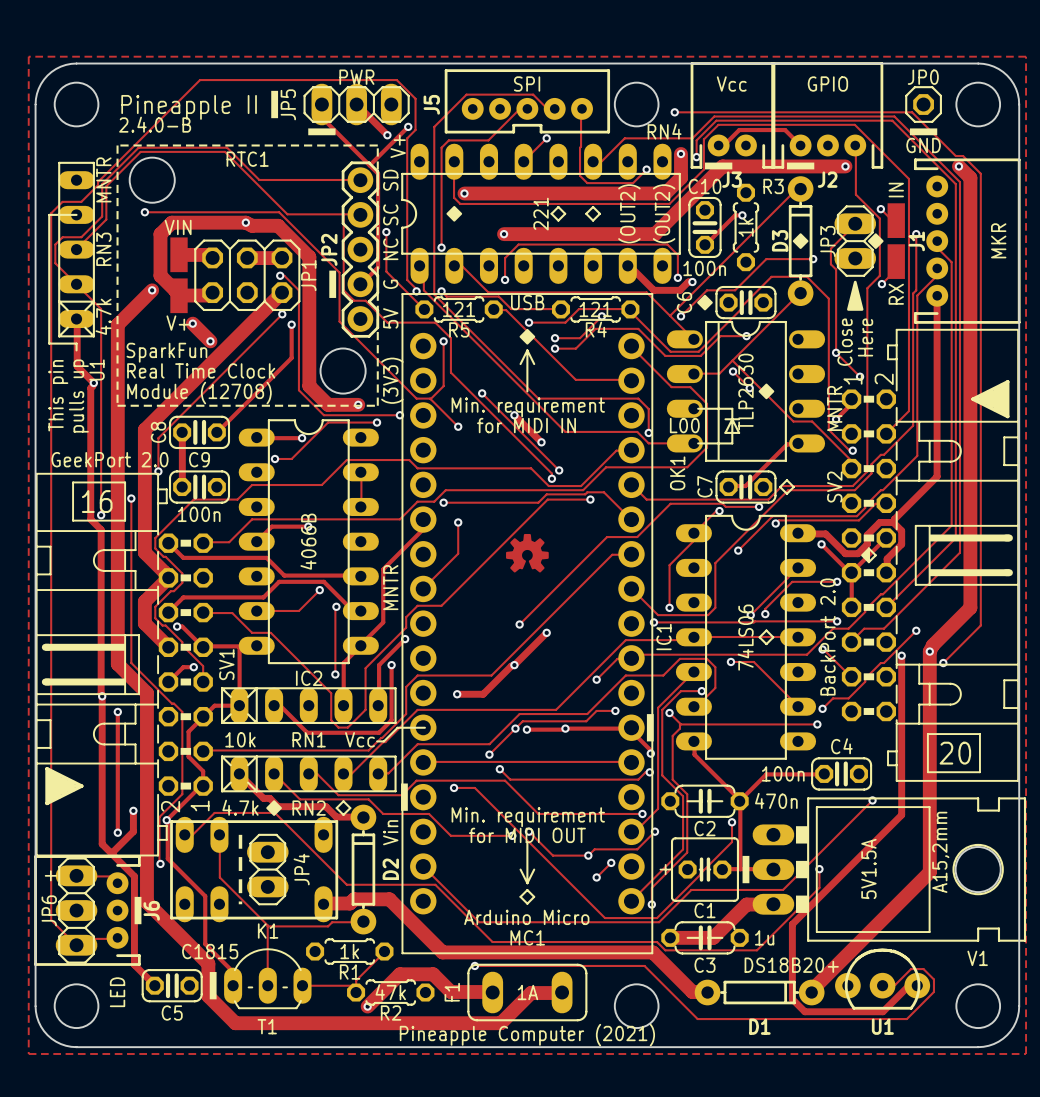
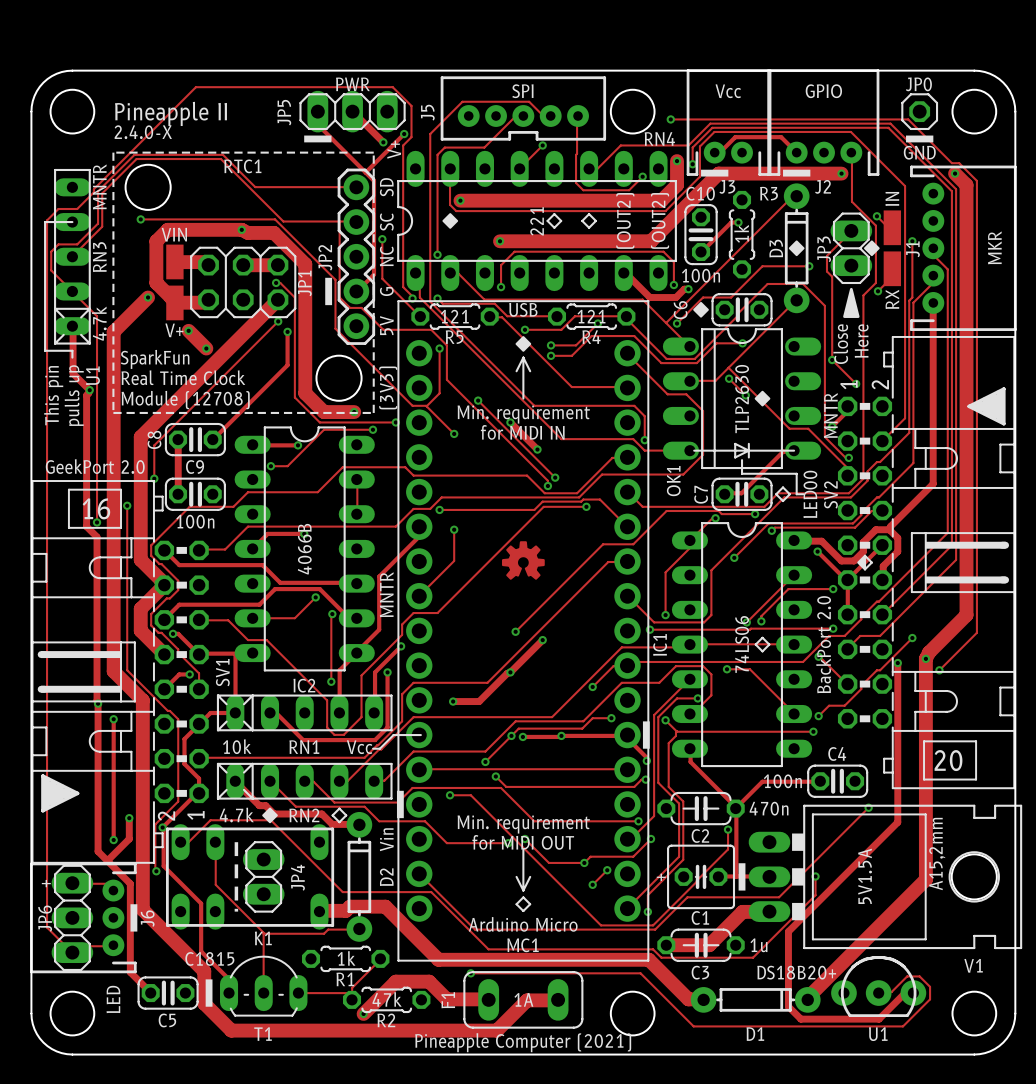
zone outline: (28, 56) (1026, 56) (1026, 1053) (28, 1053) (28, 56) -> none
drawing: [271, 90, 279, 119] -> none
text: 2.4.0-B (155, 124) -> 2.4.0-X (143, 132)
line: (698, 408) (732, 408) (732, 443) -> (794, 450) (728, 450)
line: (725, 419) (739, 419) -> none
line: (732, 419) (725, 432) (739, 432) (732, 419) -> none
text: L00 (684, 425) -> none
line: none -> (735, 443) (735, 457) (748, 450) (735, 443)
line: none -> (748, 443) (748, 457)
line: none -> (742, 460) (742, 473) (796, 473) (796, 494) (803, 494)
text: none -> LED00 (810, 494)

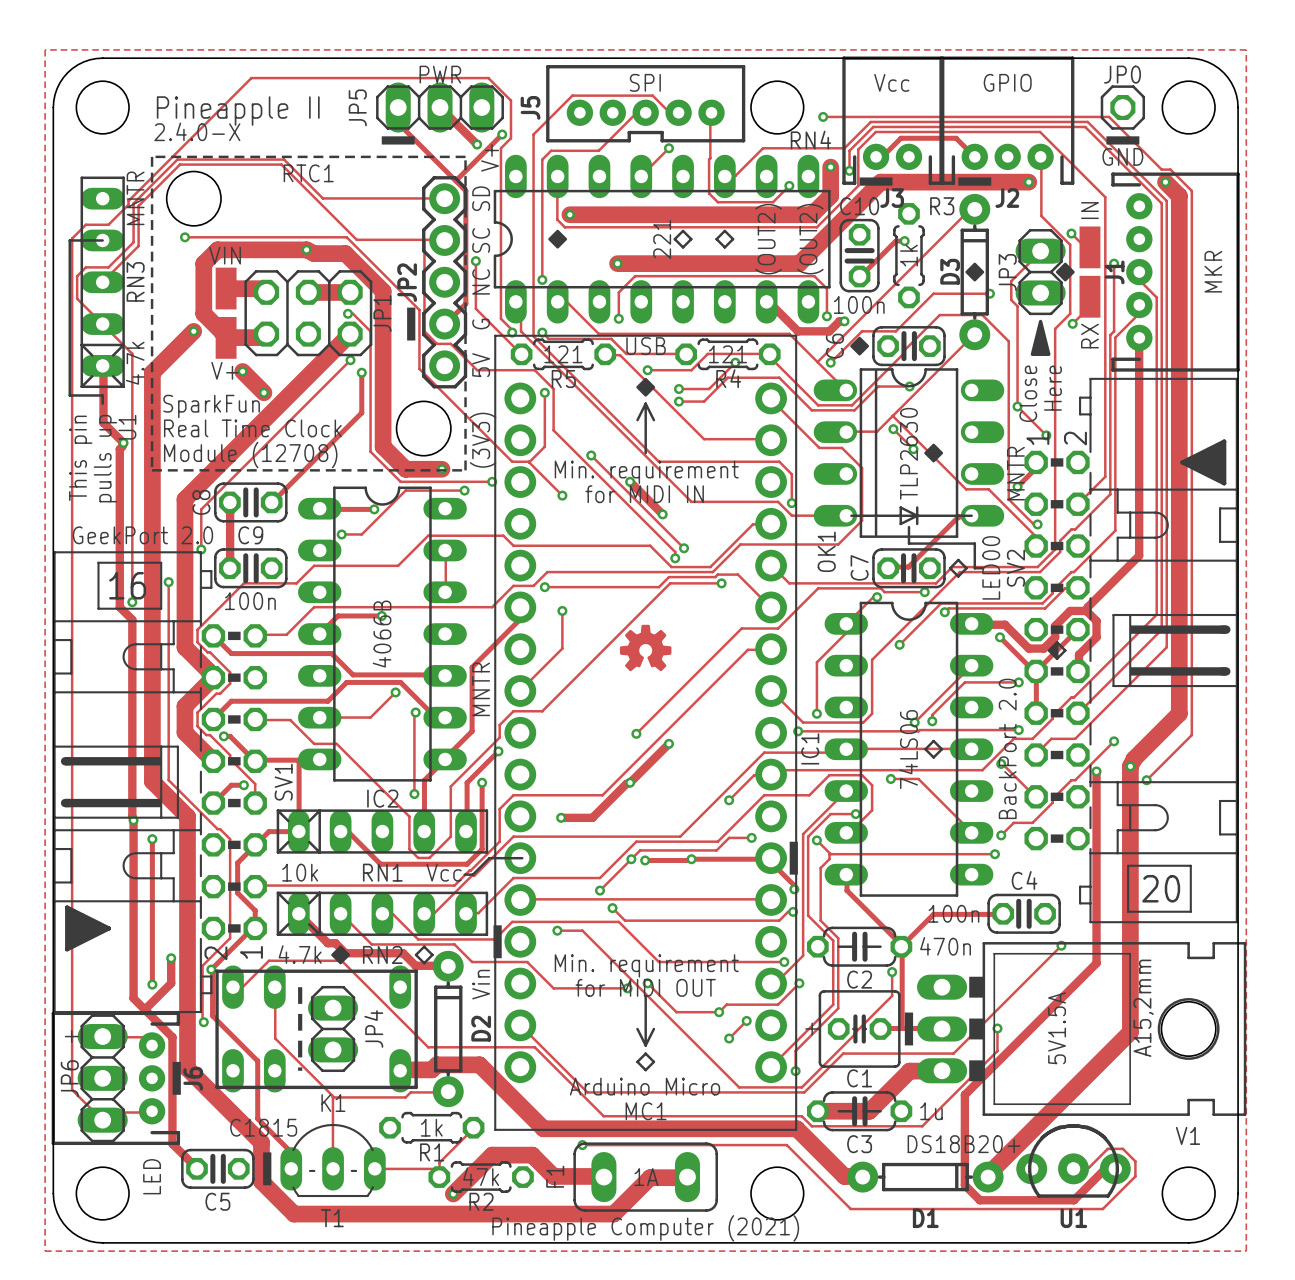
zone outline: none -> (45, 49) (1246, 49) (1246, 1251) (45, 1251) (45, 49)

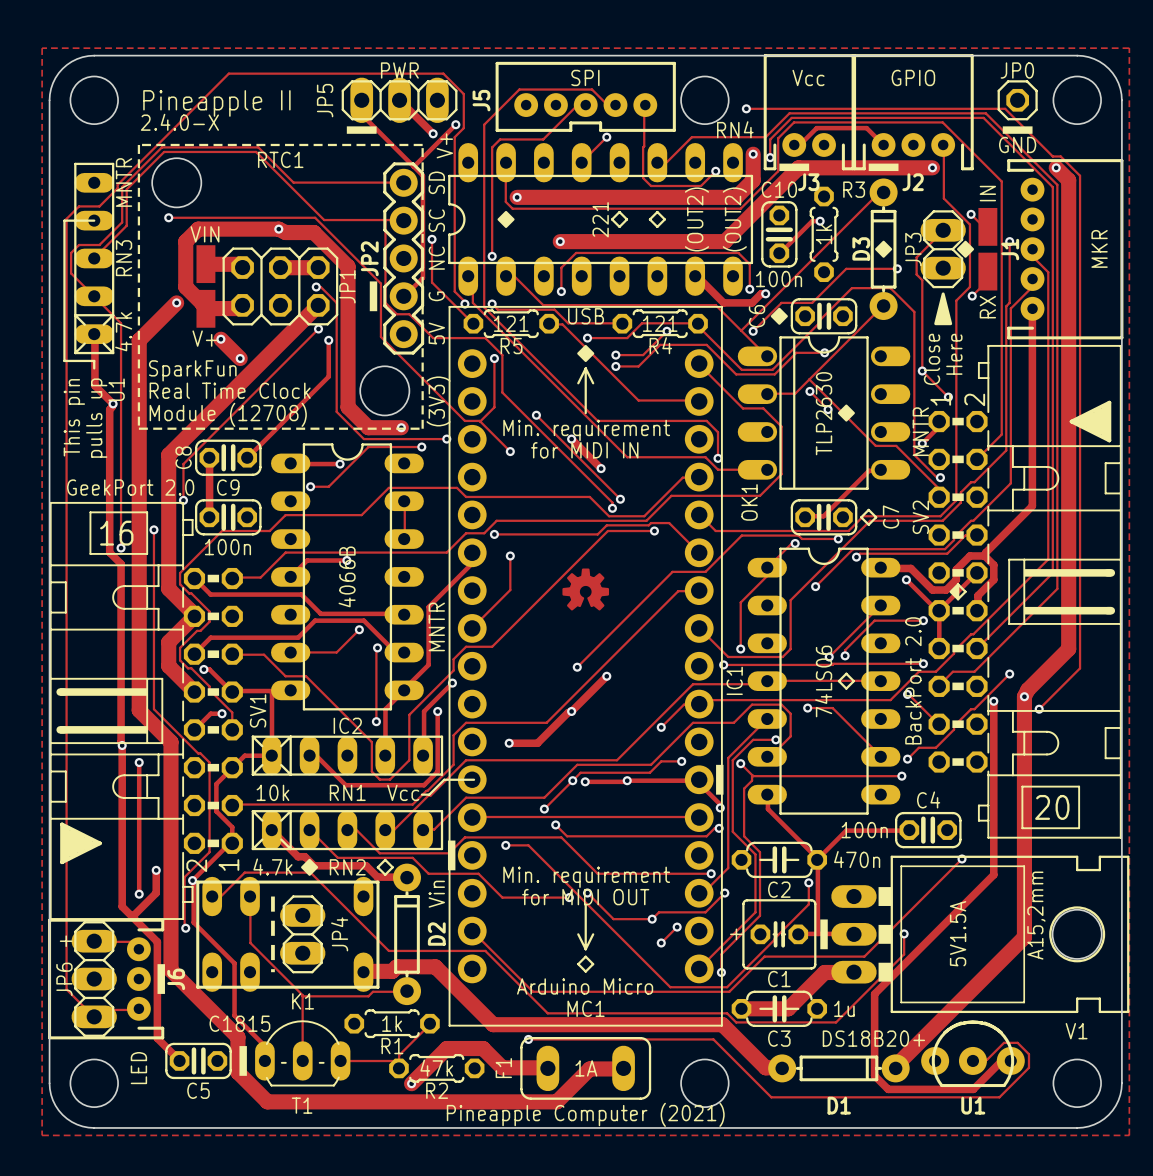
line: (900, 507) (900, 523) (917, 515) (900, 507) -> none
line: (917, 507) (917, 523) -> none
line: (851, 515) (971, 515) -> none
line: (908, 527) (908, 543) (974, 543) (974, 568) (983, 568) -> none
C7 name position: C7 (859, 567) -> C7 (891, 517)
text: LED00 (991, 567) -> none

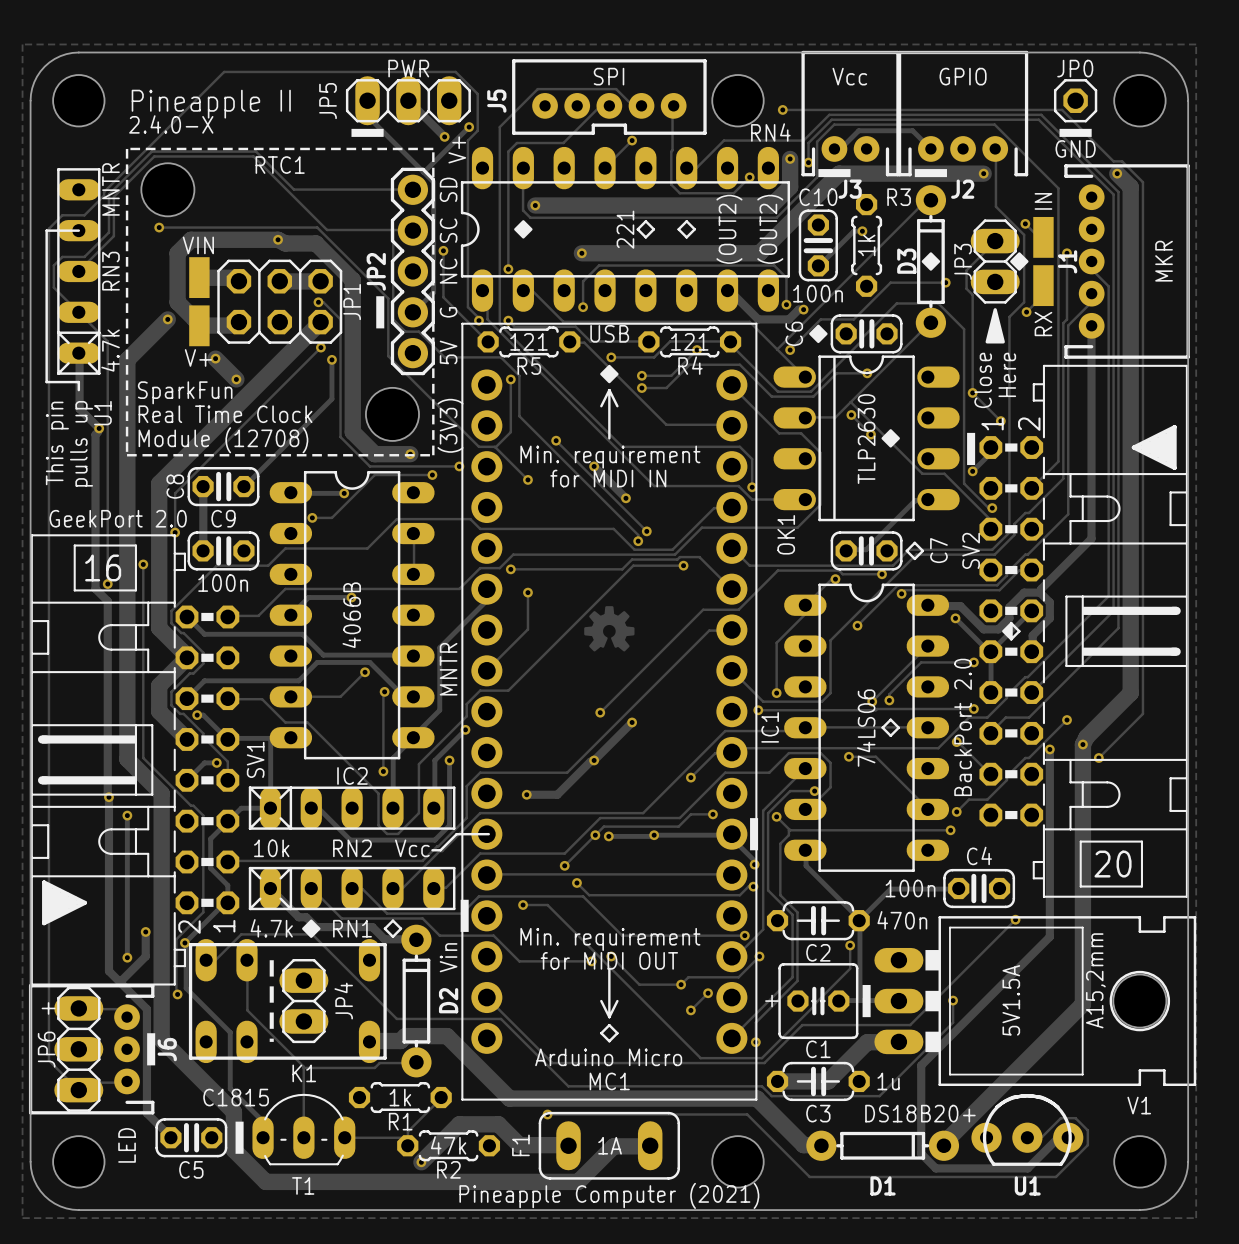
drawing: none -> [967, 432, 976, 466]
text: MNTR (920, 431) -> none
RN1 name: RN1 (347, 792) -> RN2 (352, 848)
RN2 name: RN2 (347, 867) -> RN1 (352, 928)

